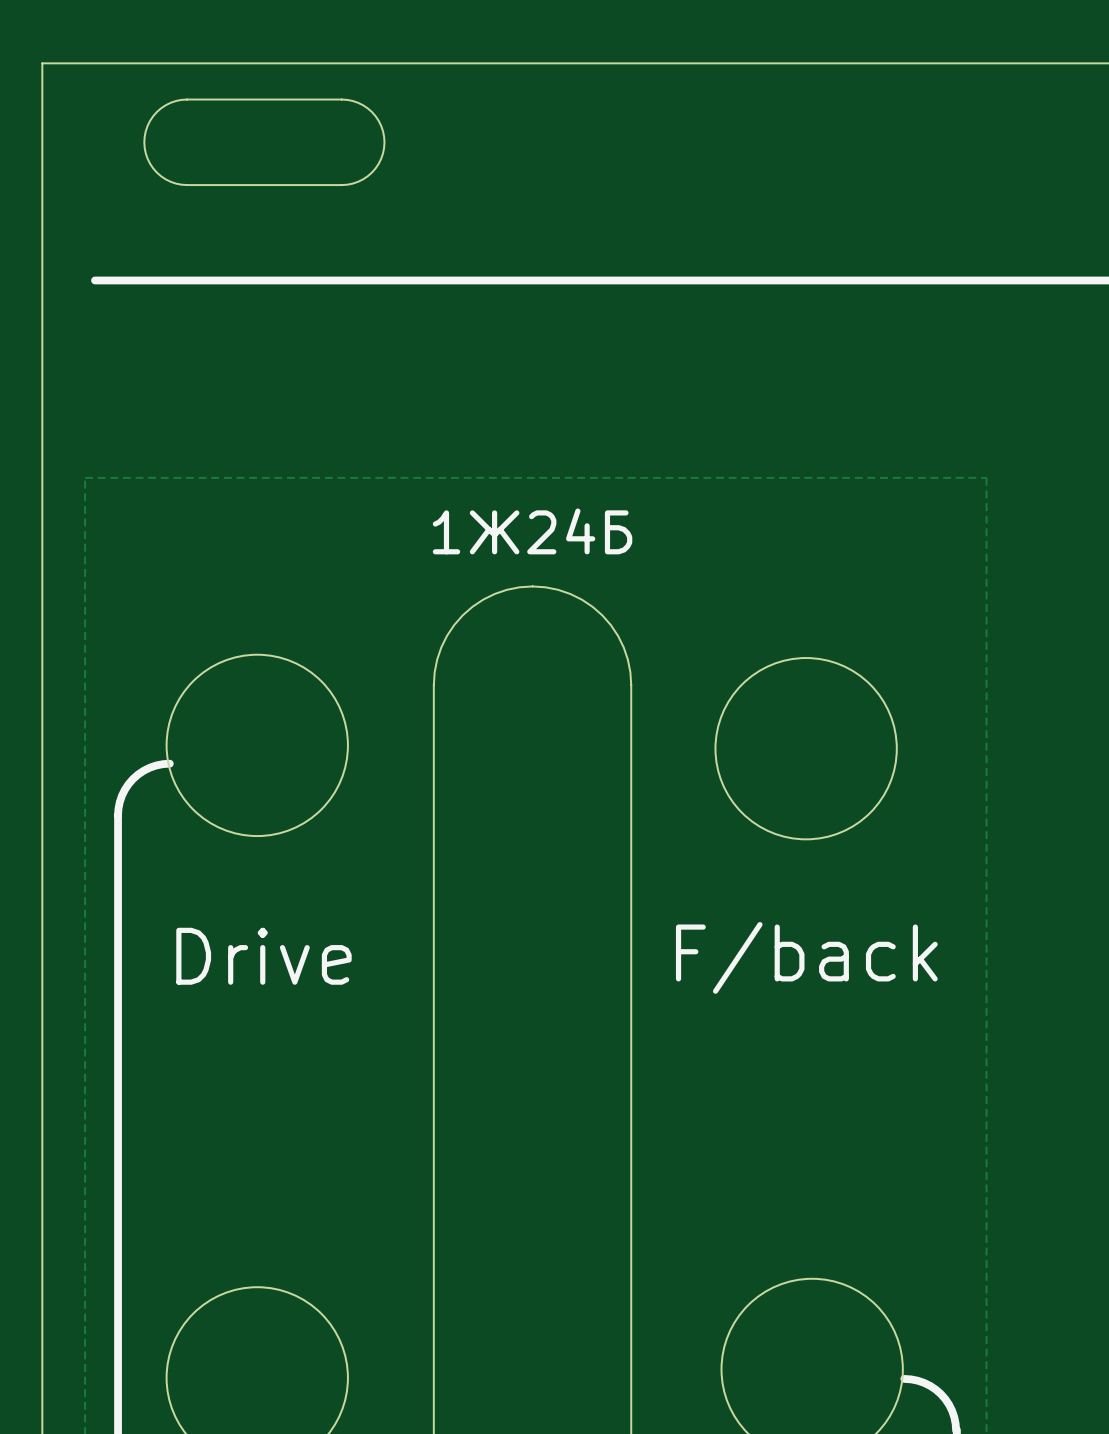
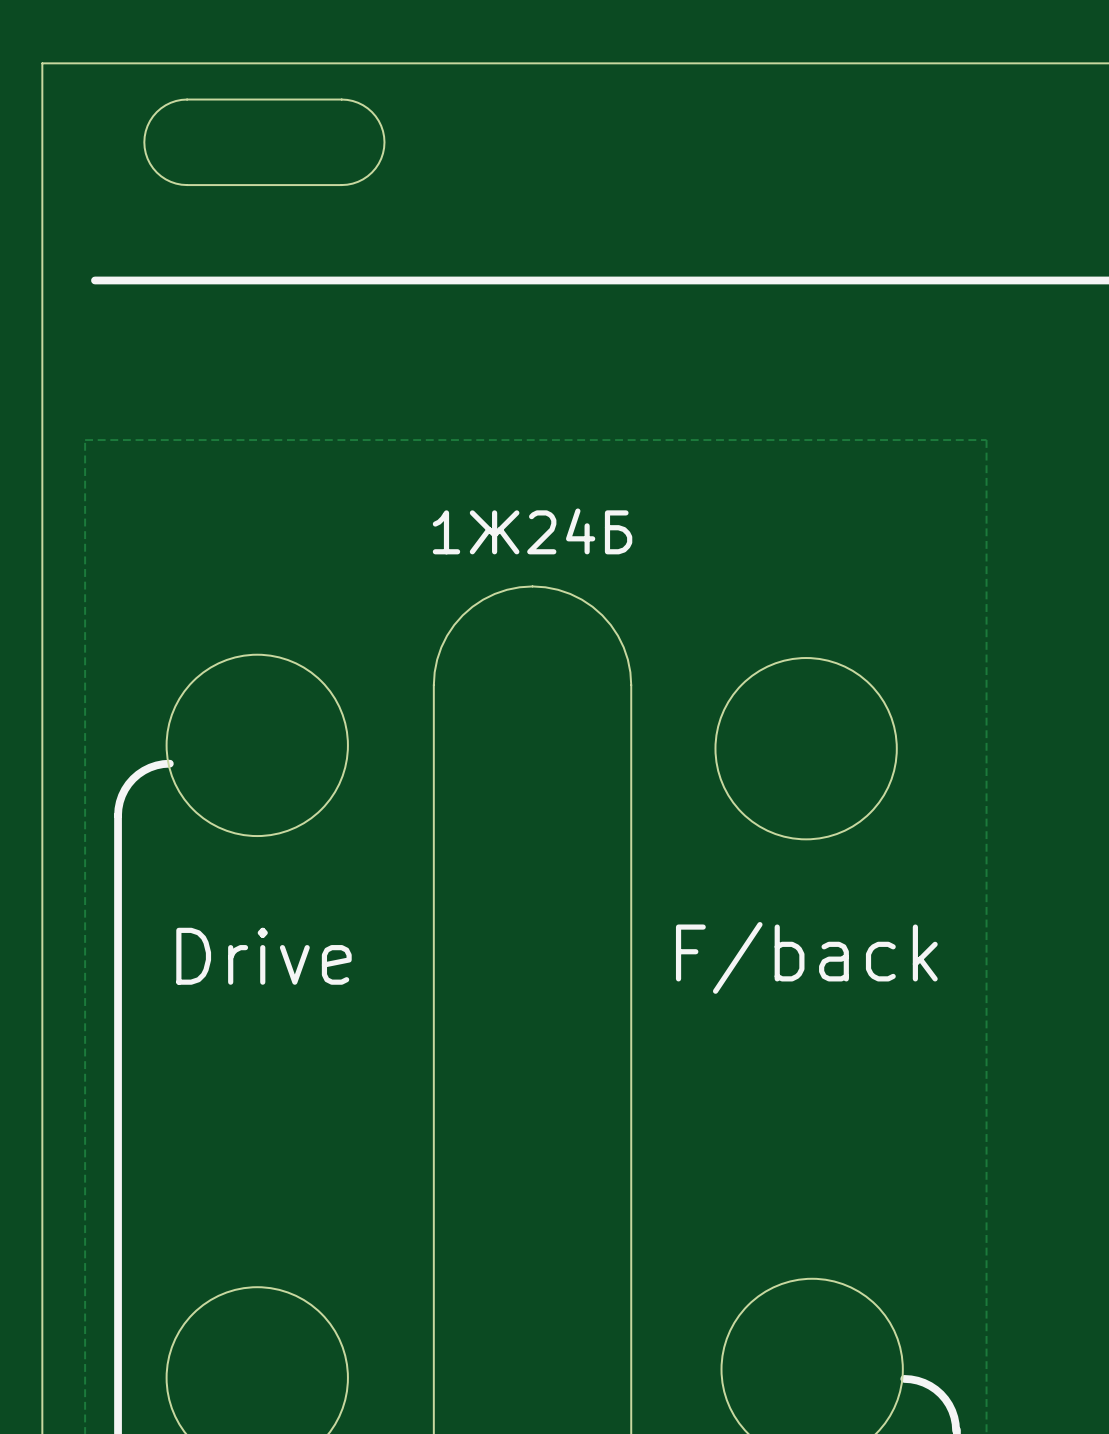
zone outline: (85, 477) (986, 477) -> (85, 477) (85, 440) (986, 440) (986, 477)

